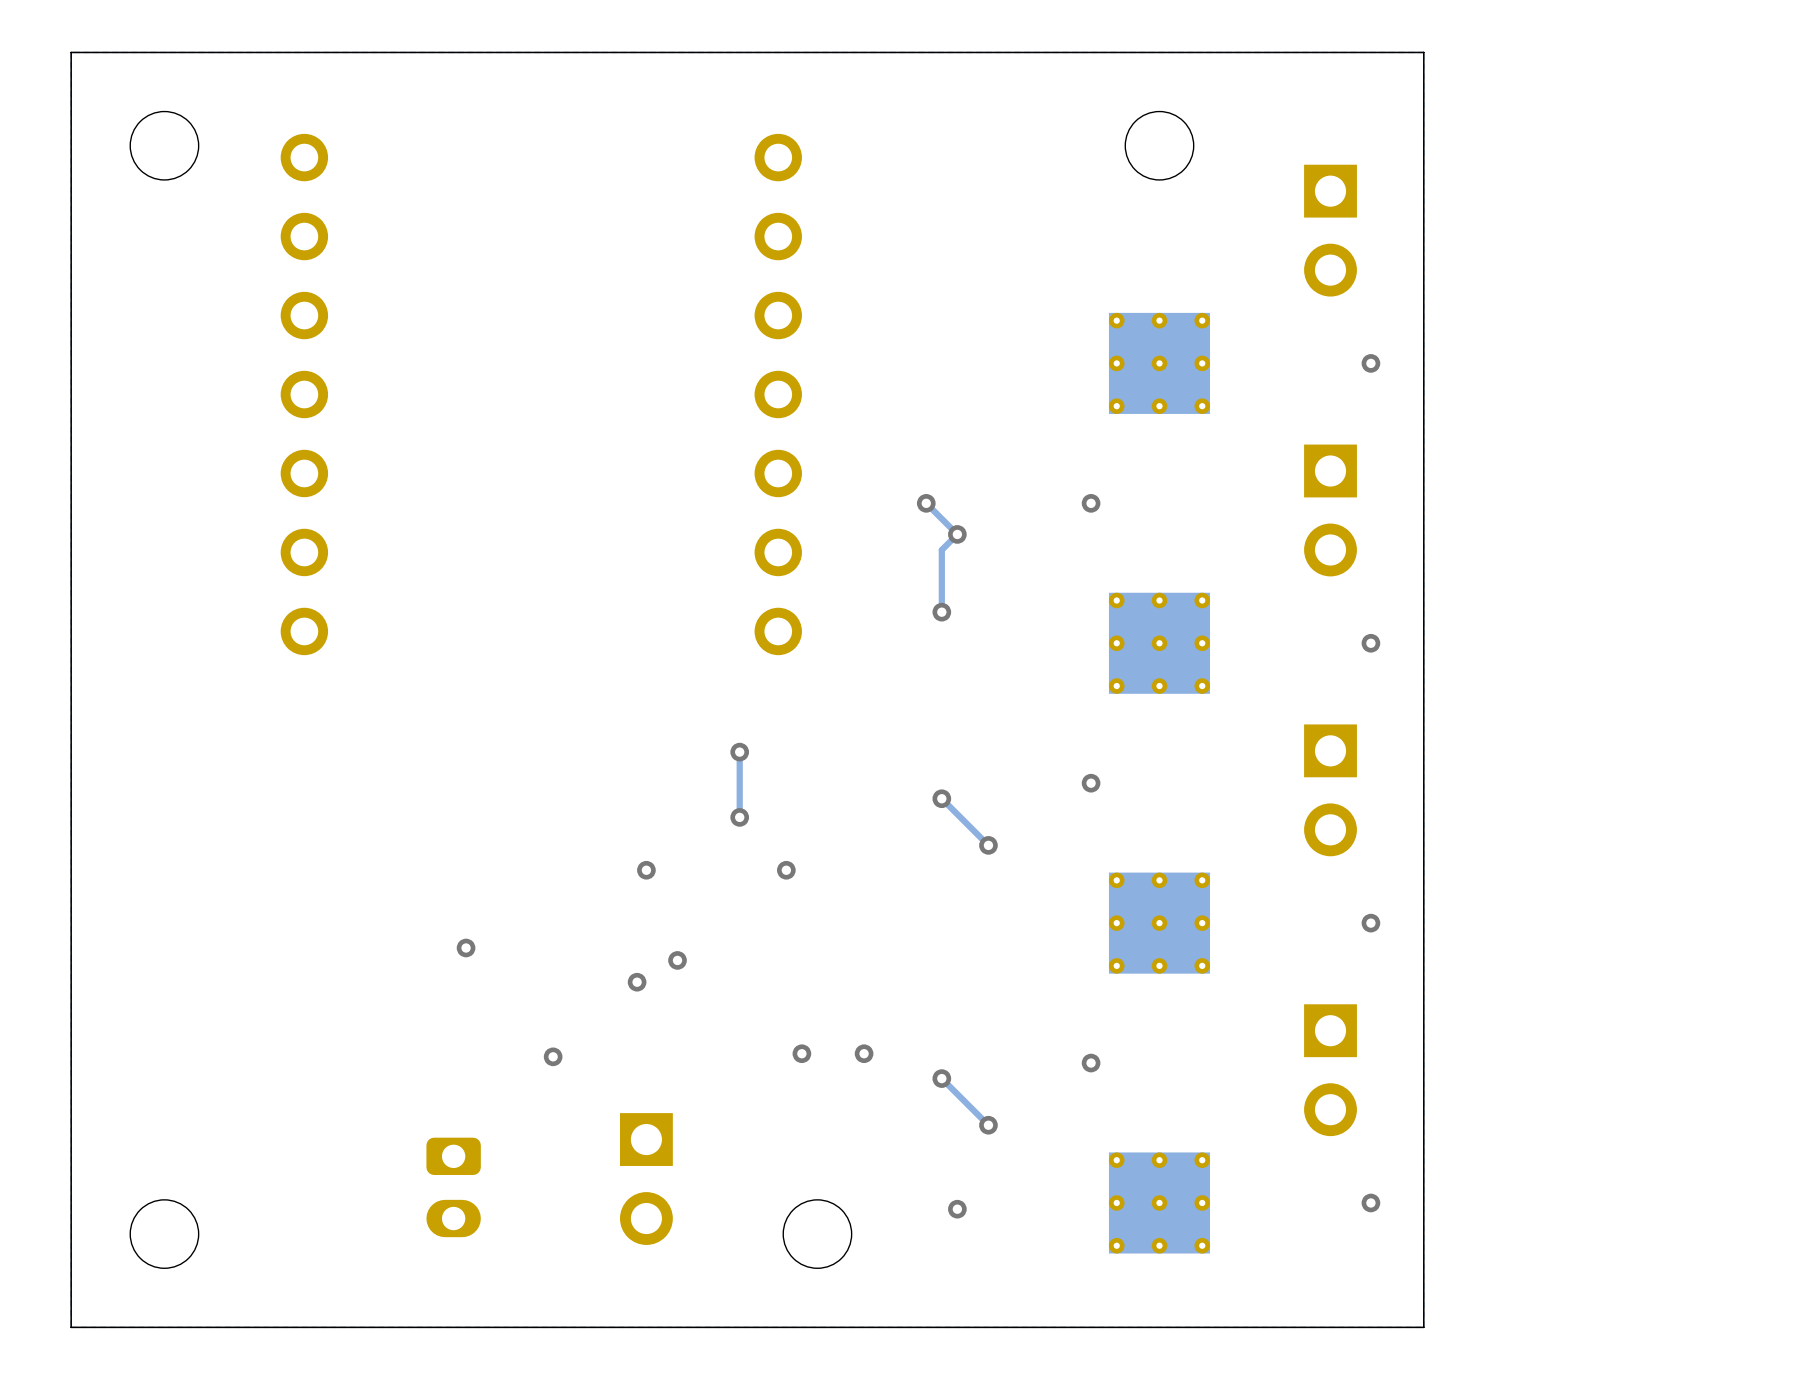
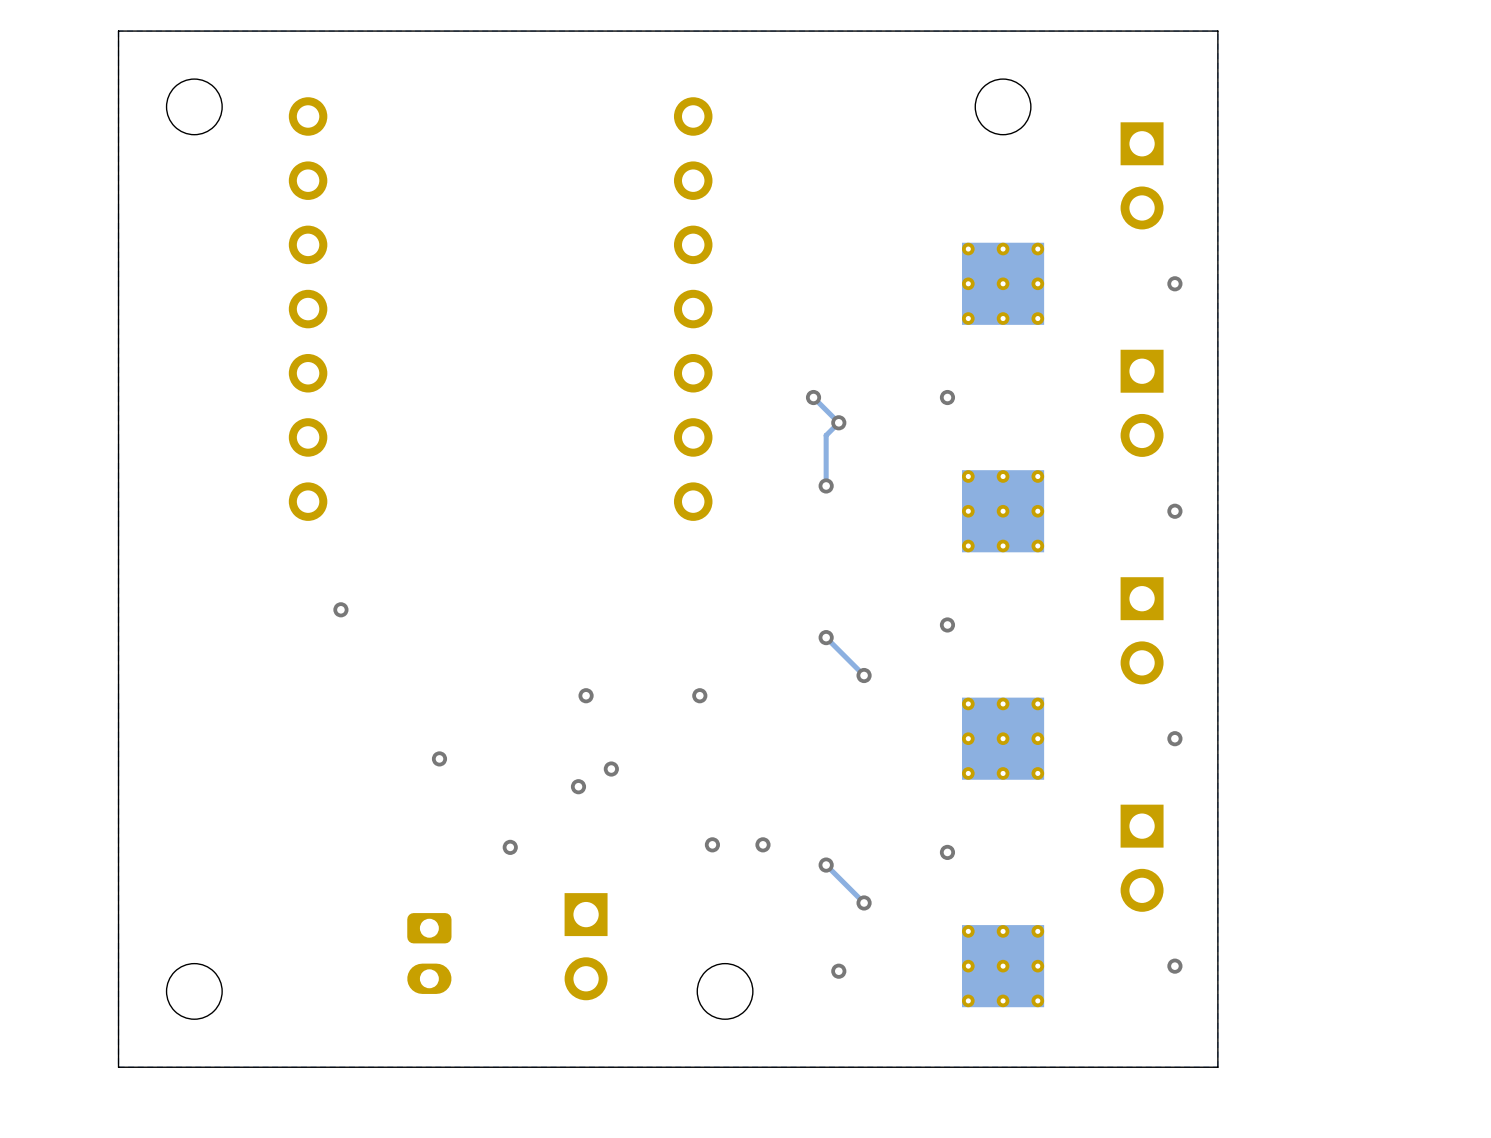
track: (739, 752) (739, 817) -> none
via: (739, 752) -> none
via: none -> (340, 609)
via: (739, 817) -> none

